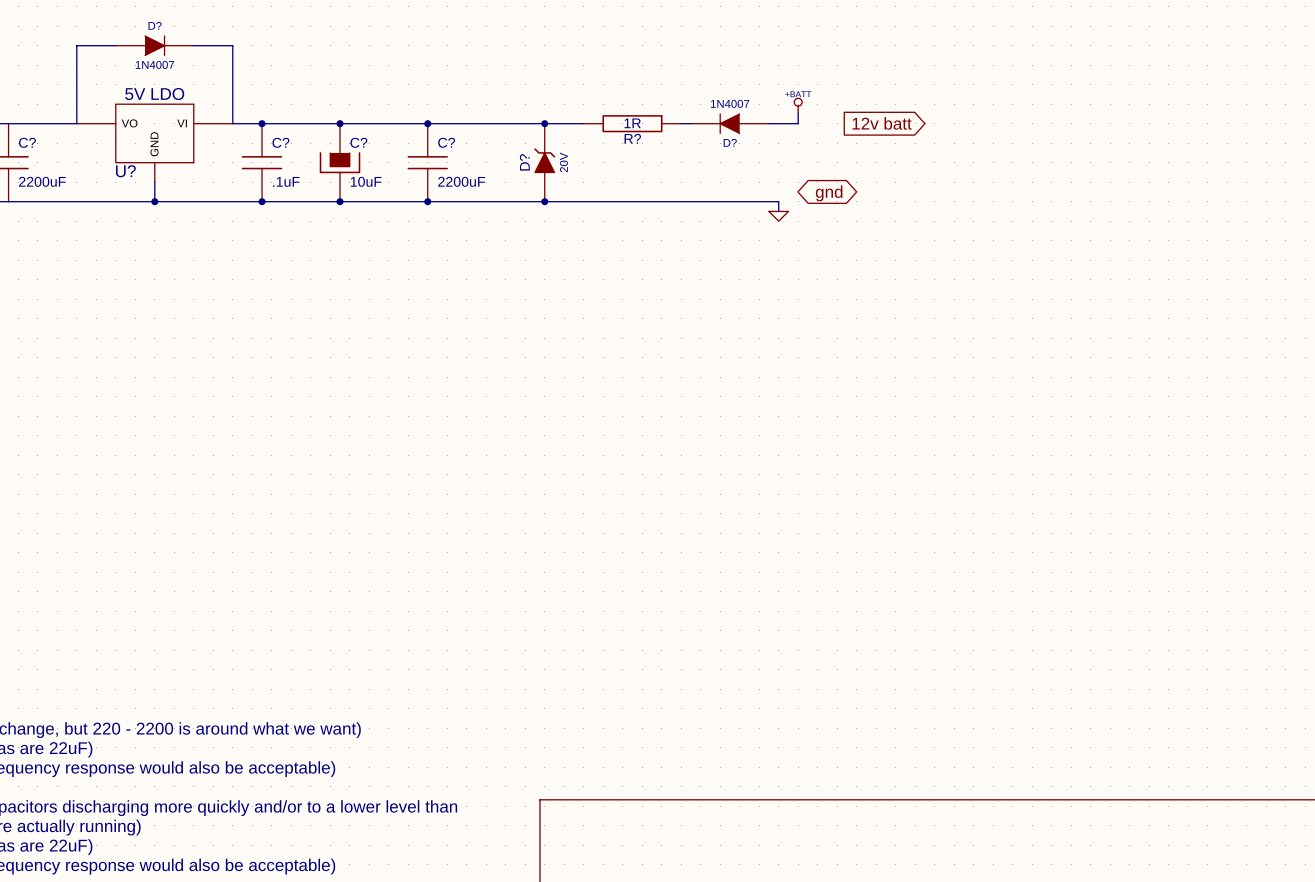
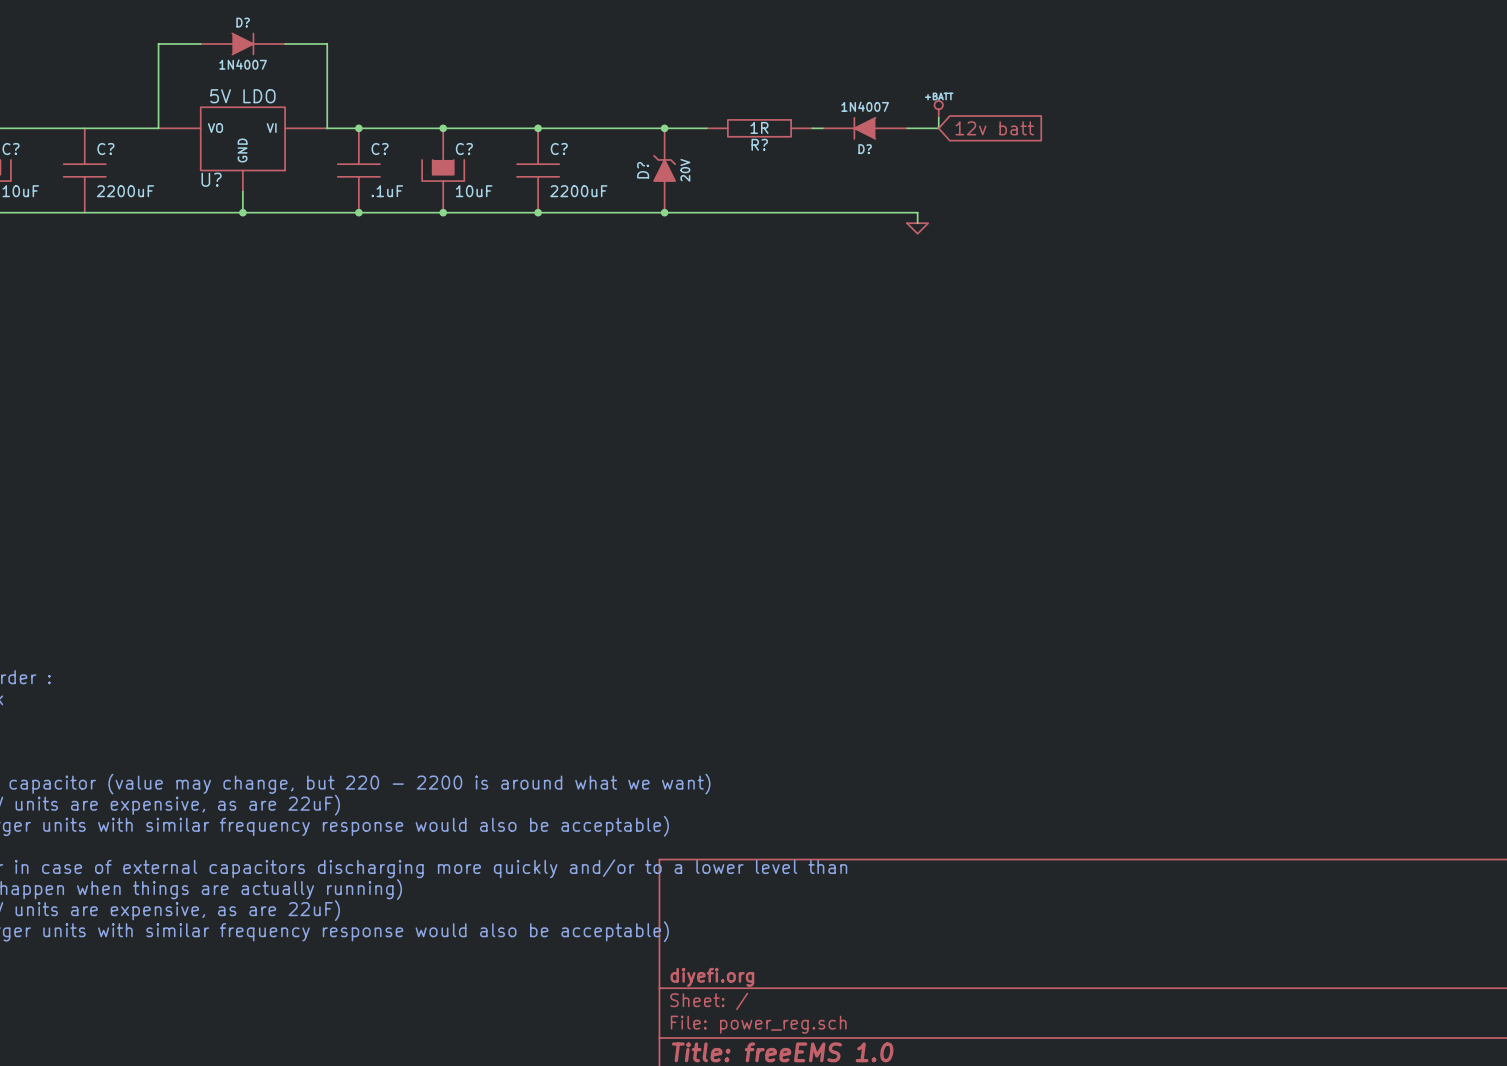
global label rotation: 0° (882, 123) -> 180° (994, 128)
global label: gnd (829, 193) -> none

